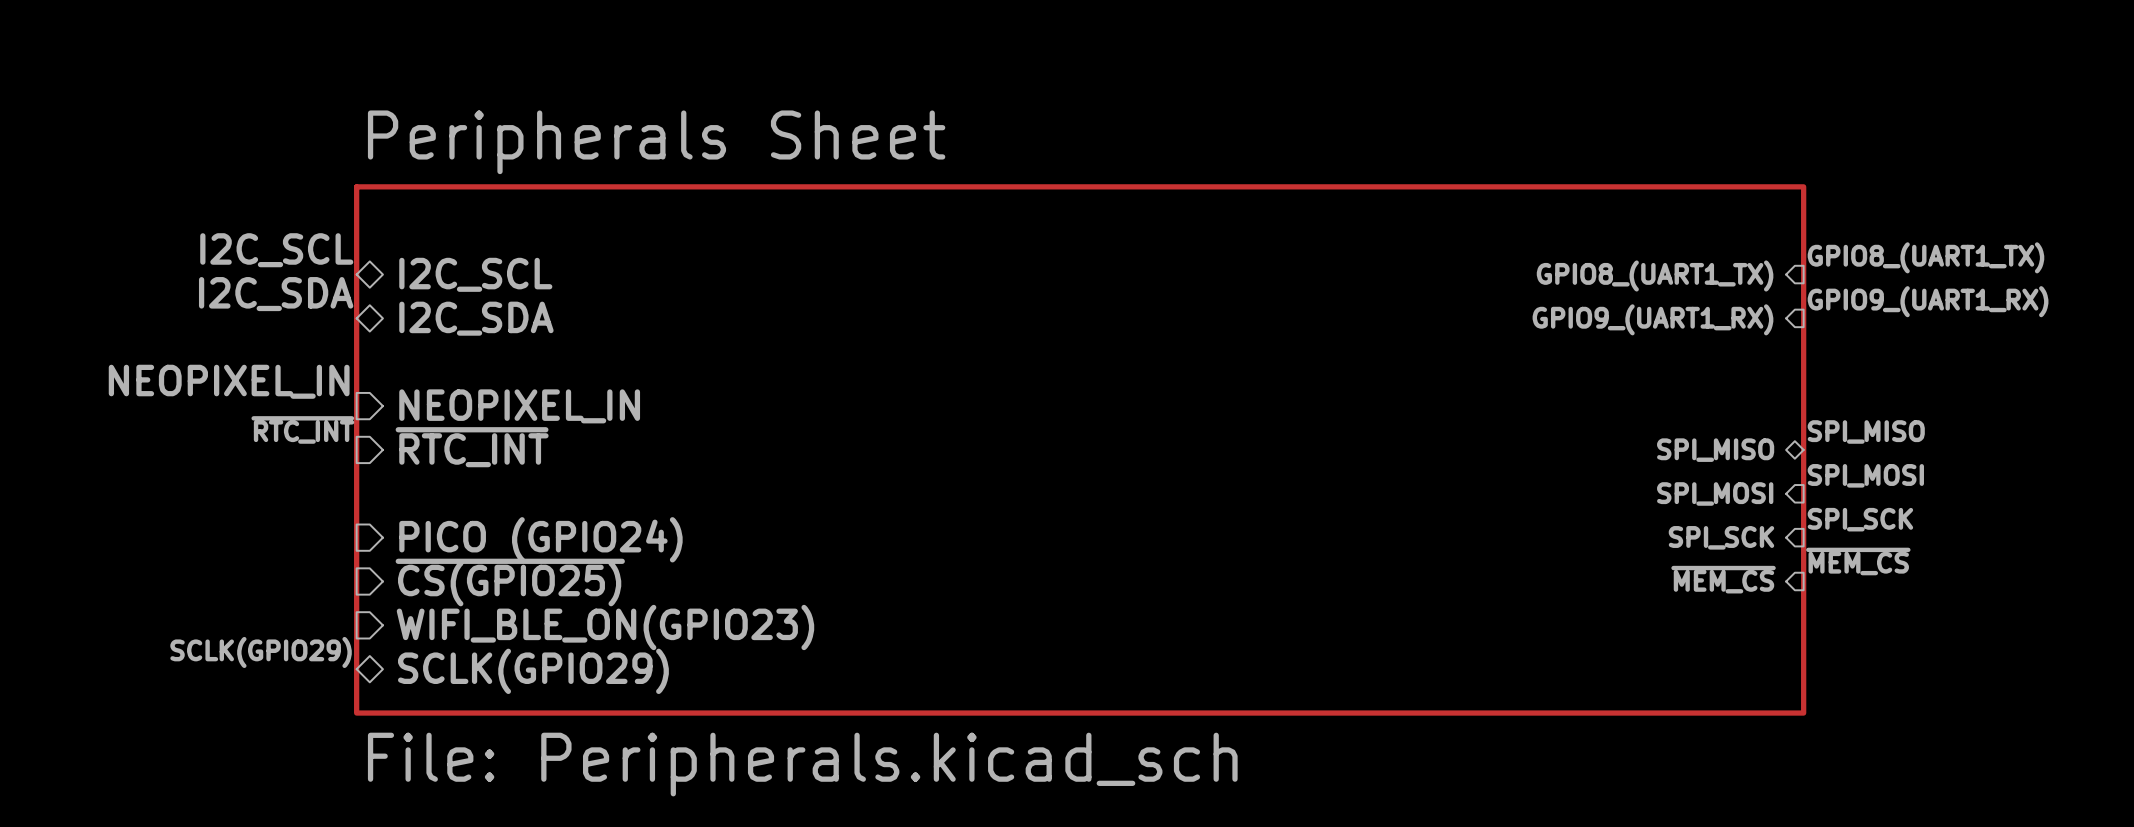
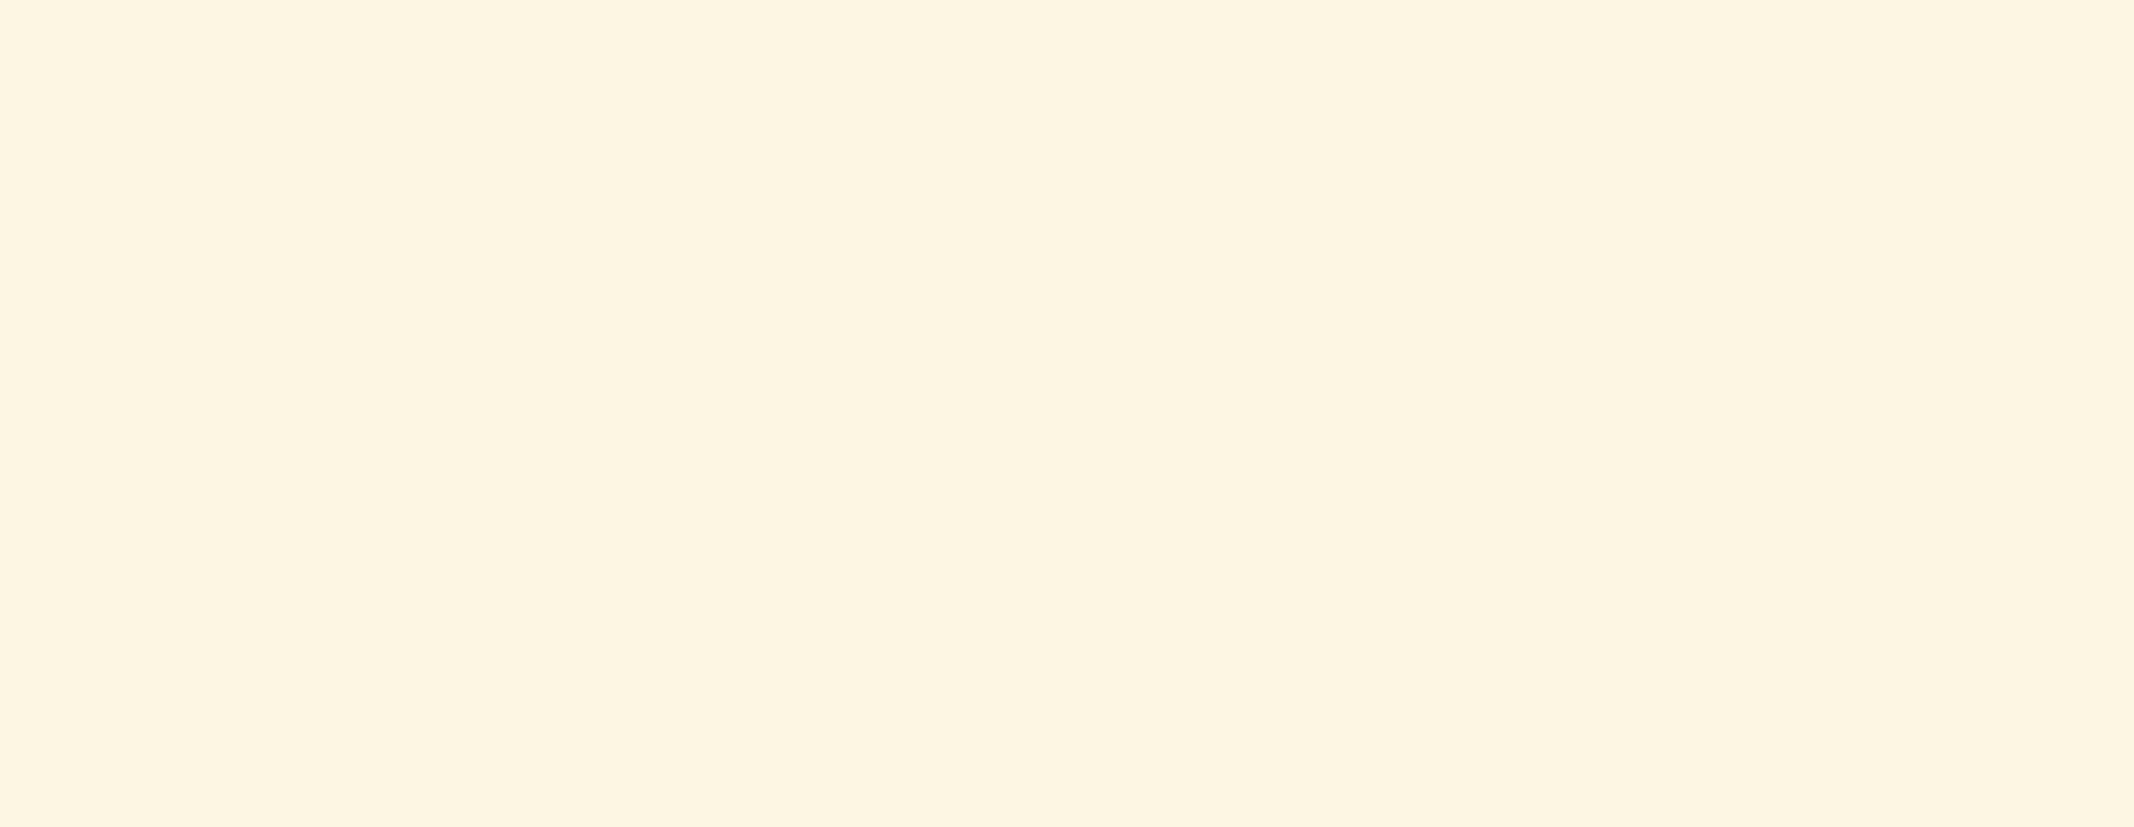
label: I2C_SCL (276, 250) -> none
label: GPIO8_(UART1_TX) (1925, 257) -> none
sheet pin: I2C_SCL (475, 274) -> none
sheet pin: GPIO8_(UART1_TX) (1655, 275) -> none
label: I2C_SDA (276, 294) -> none
label: GPIO9_(UART1_RX) (1928, 301) -> none
sheet pin: I2C_SDA (476, 318) -> none
sheet pin: GPIO9_(UART1_RX) (1652, 319) -> none
label: NEOPIXEL_IN (229, 381) -> none
sheet pin: NEOPIXEL_IN (519, 406) -> none
label: ~{RTC_INT} (302, 429) -> none
label: SPI_MISO (1866, 431) -> none
sheet pin: ~{RTC_INT} (472, 447) -> none
sheet Peripherals Sheet: File: Peripherals.kicad_sch (1080, 449) -> none
sheet pin: SPI_MISO (1715, 450) -> none
label: SPI_MOSI (1865, 475) -> none
sheet pin: SPI_MOSI (1715, 493) -> none
label: SPI_SCK (1860, 519) -> none
sheet pin: SPI_SCK (1721, 537) -> none
sheet pin: PICO (GPIO24) (540, 539) -> none
label: ~{MEM_CS} (1858, 561) -> none
sheet pin: ~{MEM_CS} (1723, 579) -> none
sheet pin: ~{CS(GPIO25)} (510, 582) -> none
sheet pin: WIFI_BLE_ON(GPIO23) (605, 627) -> none
label: SCLK(GPIO29) (261, 652) -> none
sheet pin: SCLK(GPIO29) (533, 671) -> none

